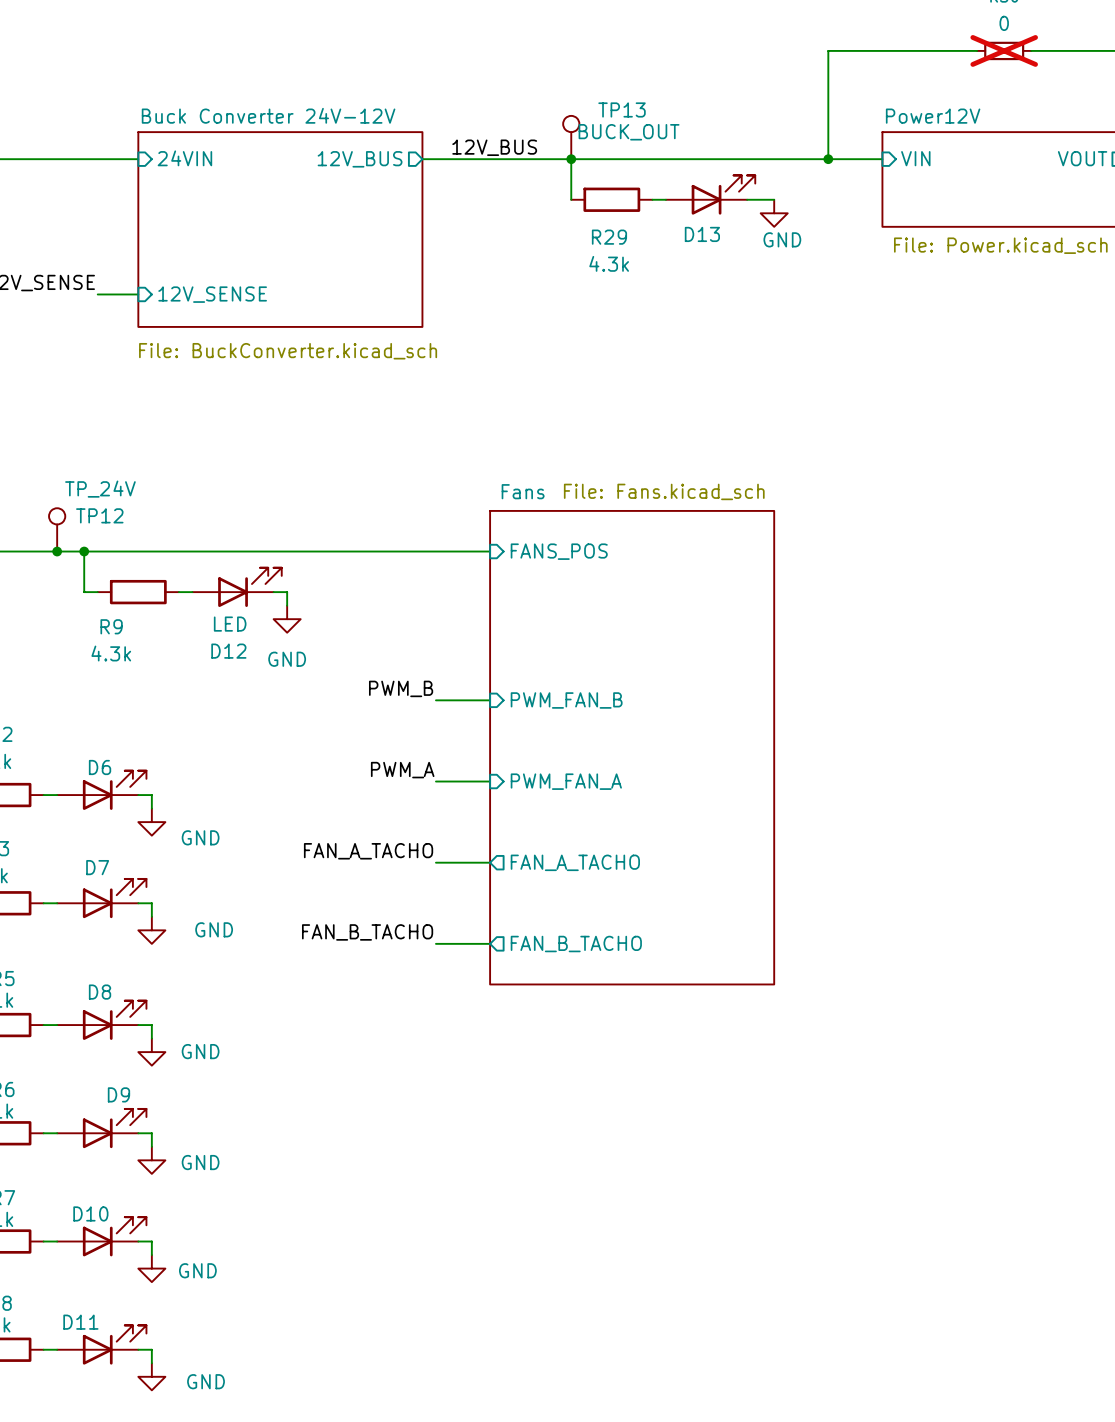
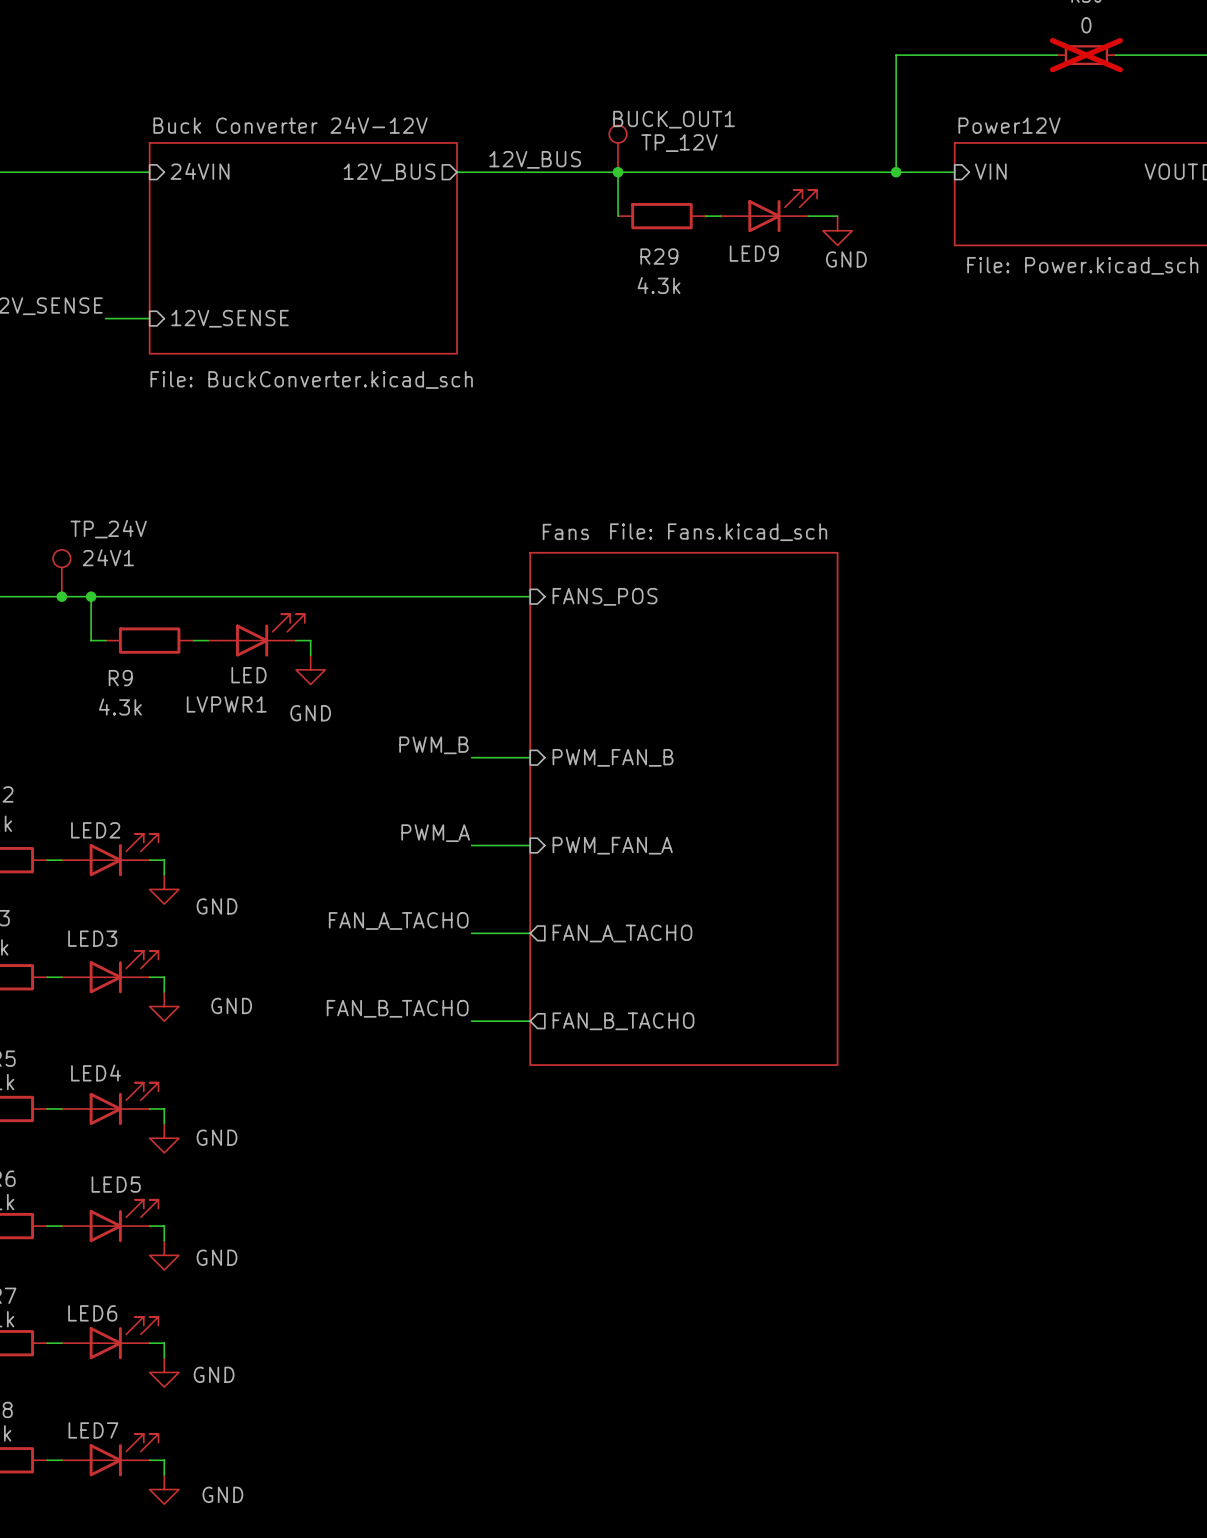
TP13 name: TP13 (622, 109) -> BUCK_OUT1 (674, 119)
TP13 value: BUCK_OUT (629, 132) -> TP_12V (679, 143)
D13 name: D13 (702, 234) -> LED9 (754, 253)
TP12 name: TP12 (99, 515) -> 24V1 (108, 557)
D12 name: D12 (228, 651) -> LVPWR1 (226, 704)
D6 name: D6 (100, 767) -> LED2 (95, 830)
D7 name: D7 (97, 867) -> LED3 (92, 938)
D8 name: D8 (100, 992) -> LED4 (96, 1072)
D9 name: D9 (118, 1094) -> LED5 (116, 1184)
D10 name: D10 (90, 1213) -> LED6 (92, 1313)
D11 name: D11 (80, 1322) -> LED7 (93, 1430)

